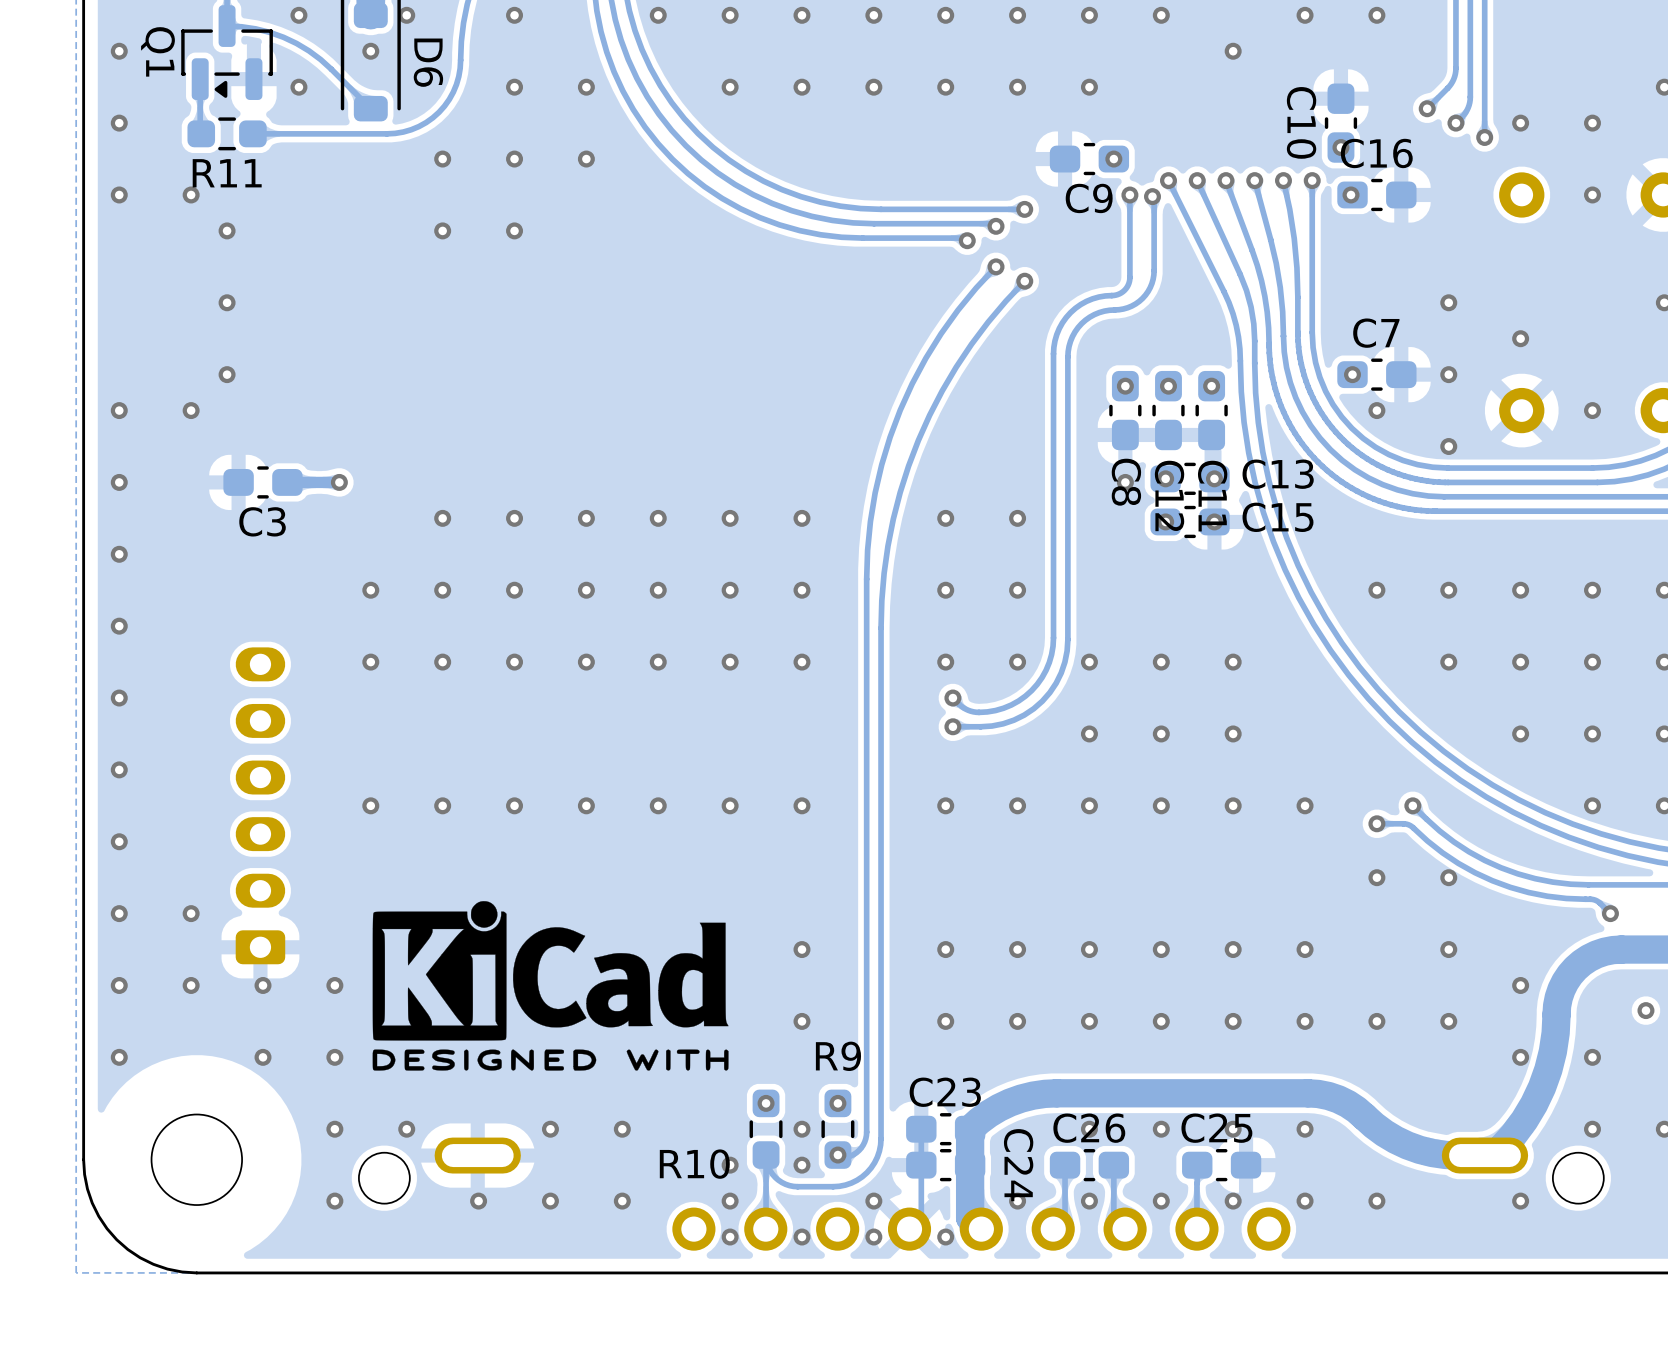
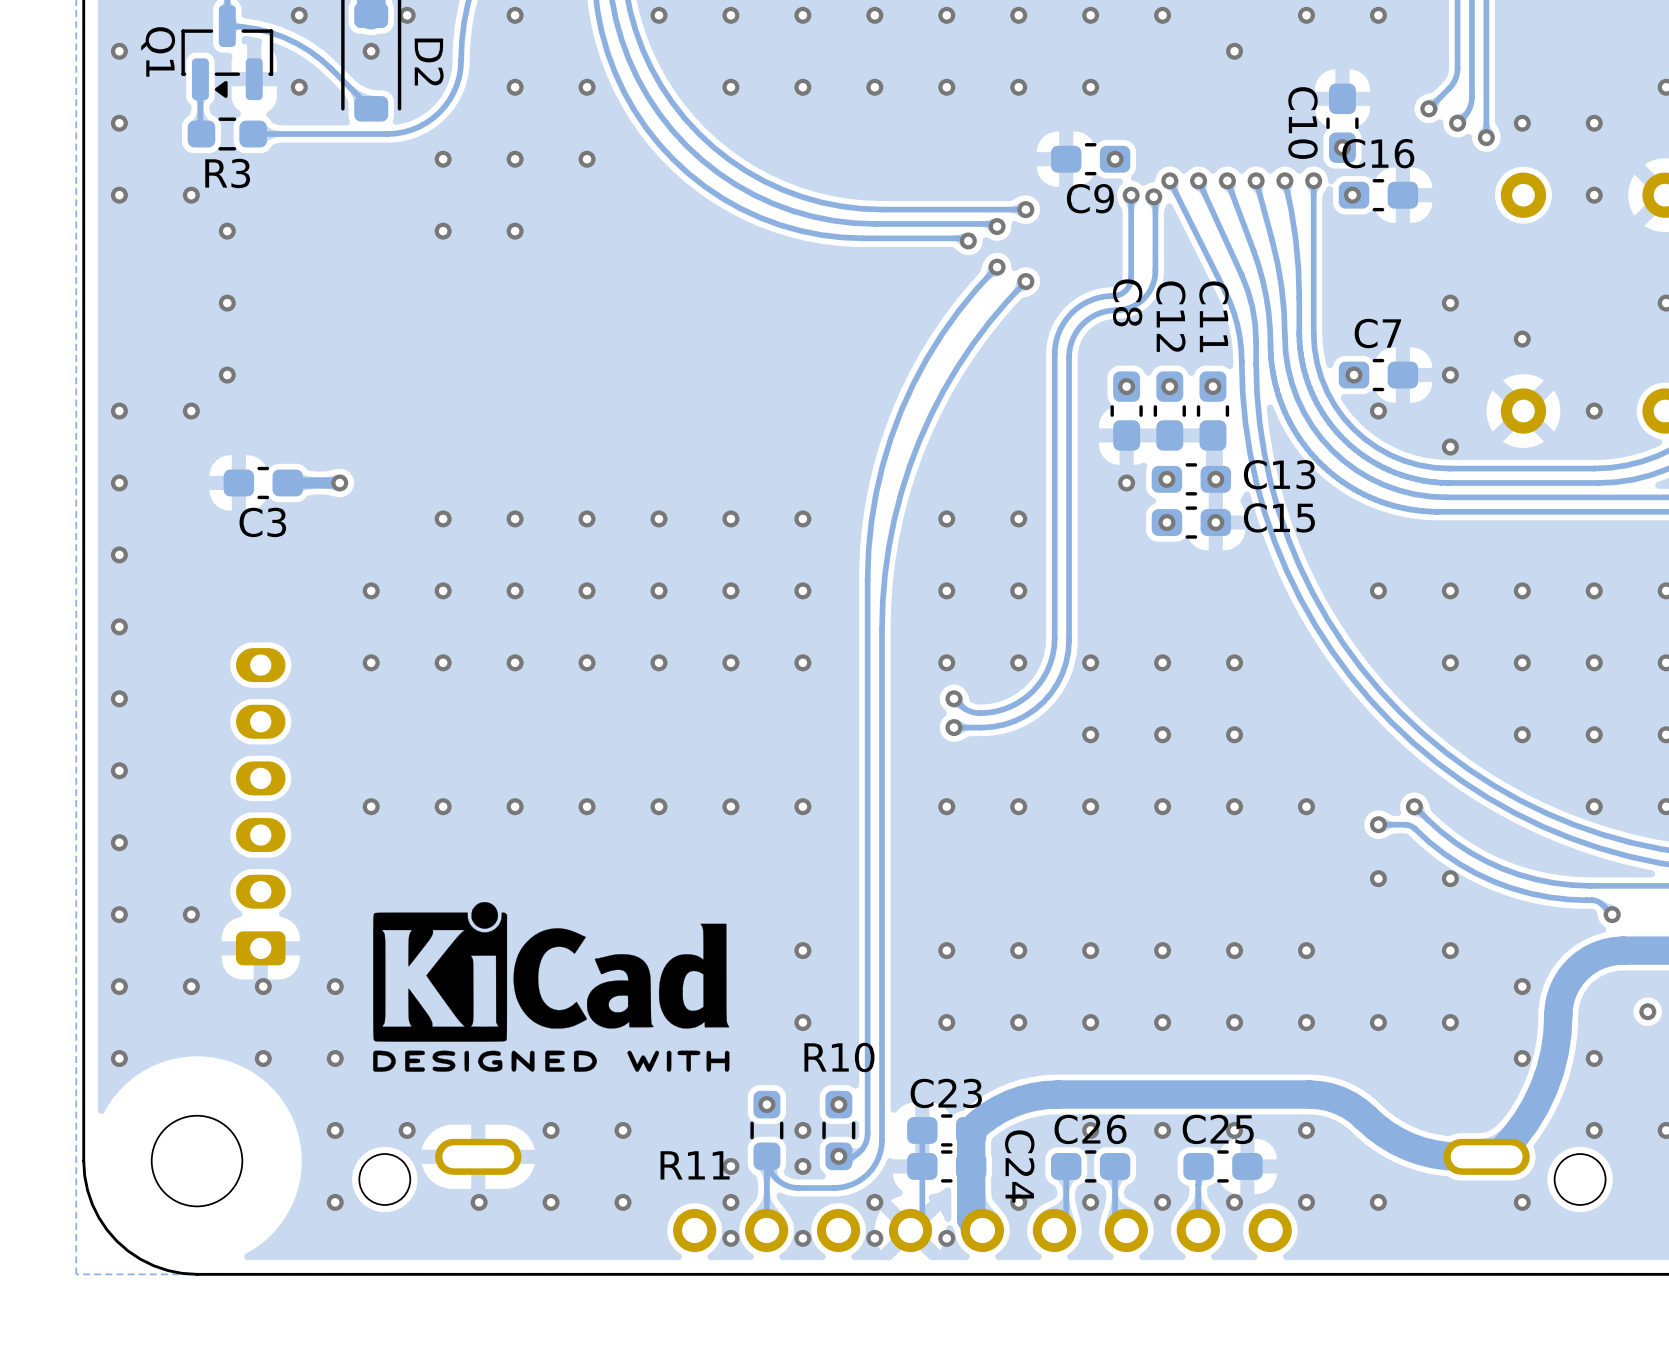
D6 name: D6 (428, 62) -> D2 (429, 62)
R11 name: R11 (227, 173) -> R3 (227, 173)
C8 name position: C8 (1126, 482) -> C8 (1127, 302)
C12 name position: C12 (1169, 495) -> C12 (1170, 316)
C11 name position: C11 (1212, 496) -> C11 (1214, 316)
R9 name: R9 (838, 1056) -> R10 (839, 1057)
R10 name: R10 (694, 1164) -> R11 (695, 1165)

